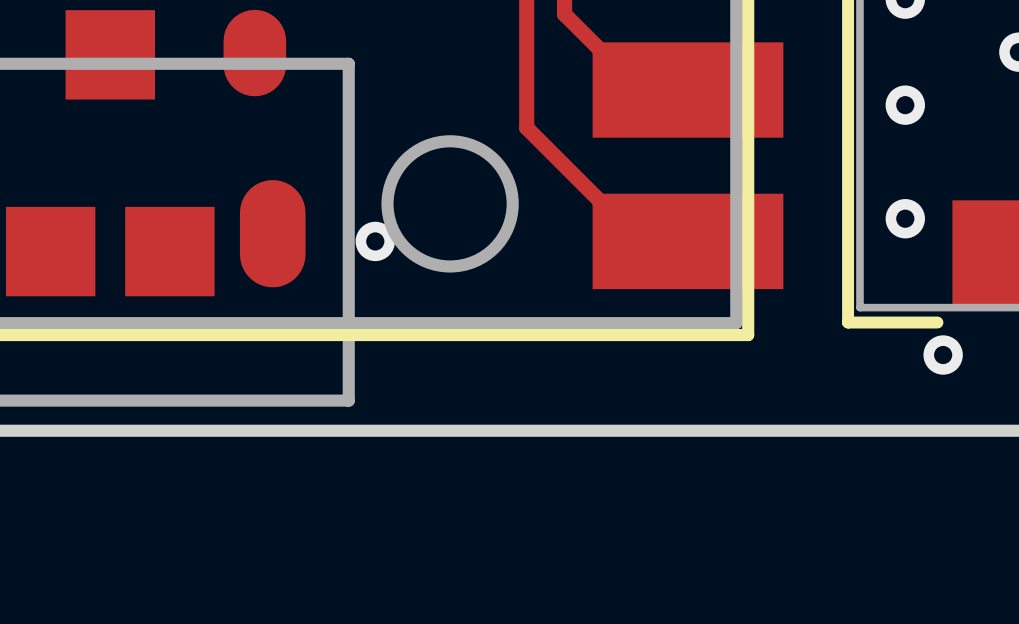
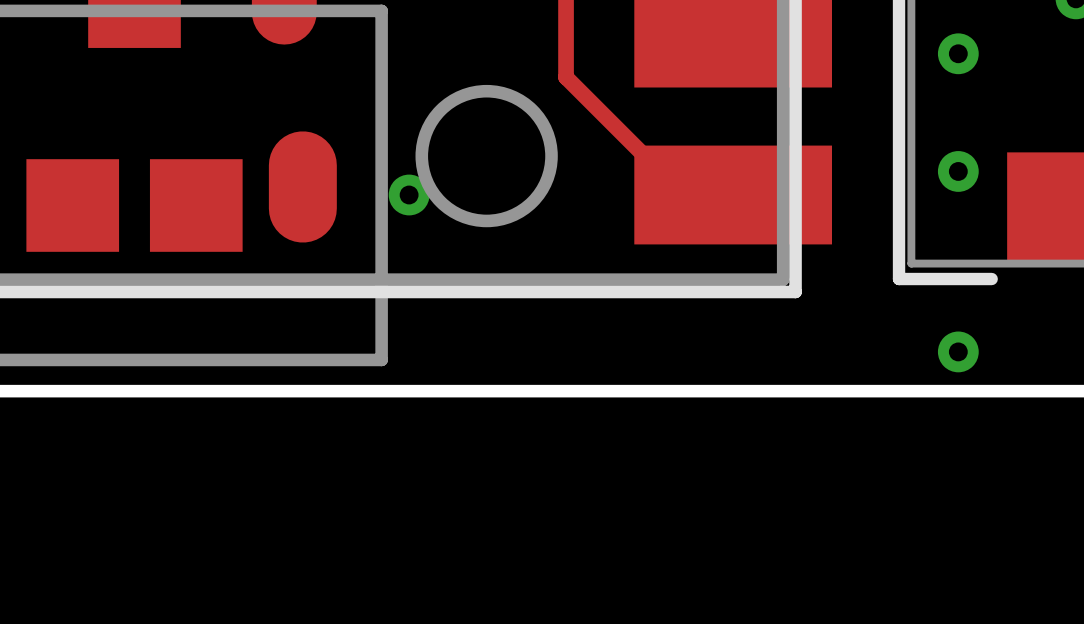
via position: (943, 355) -> (958, 351)

